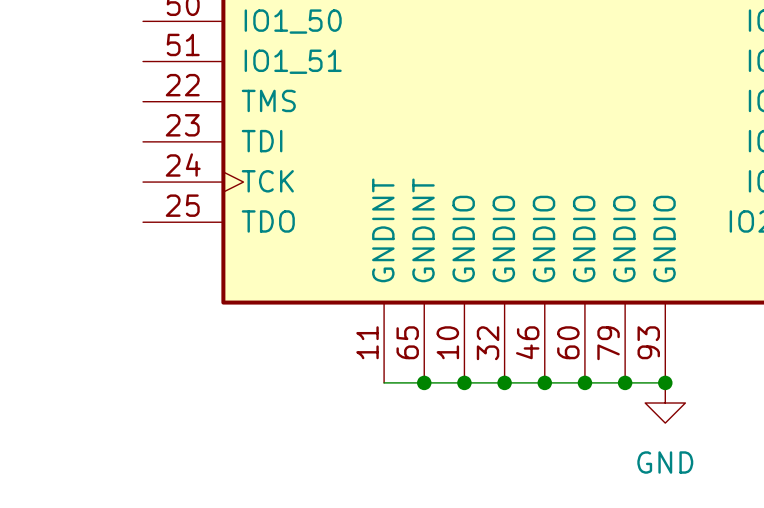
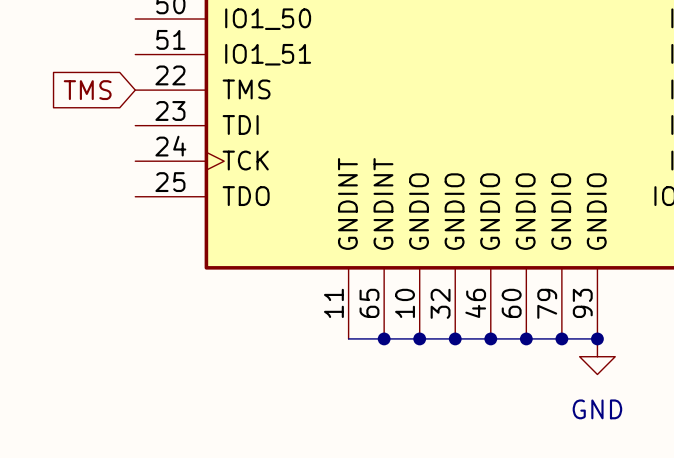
global label: none -> TMS (87, 90)

